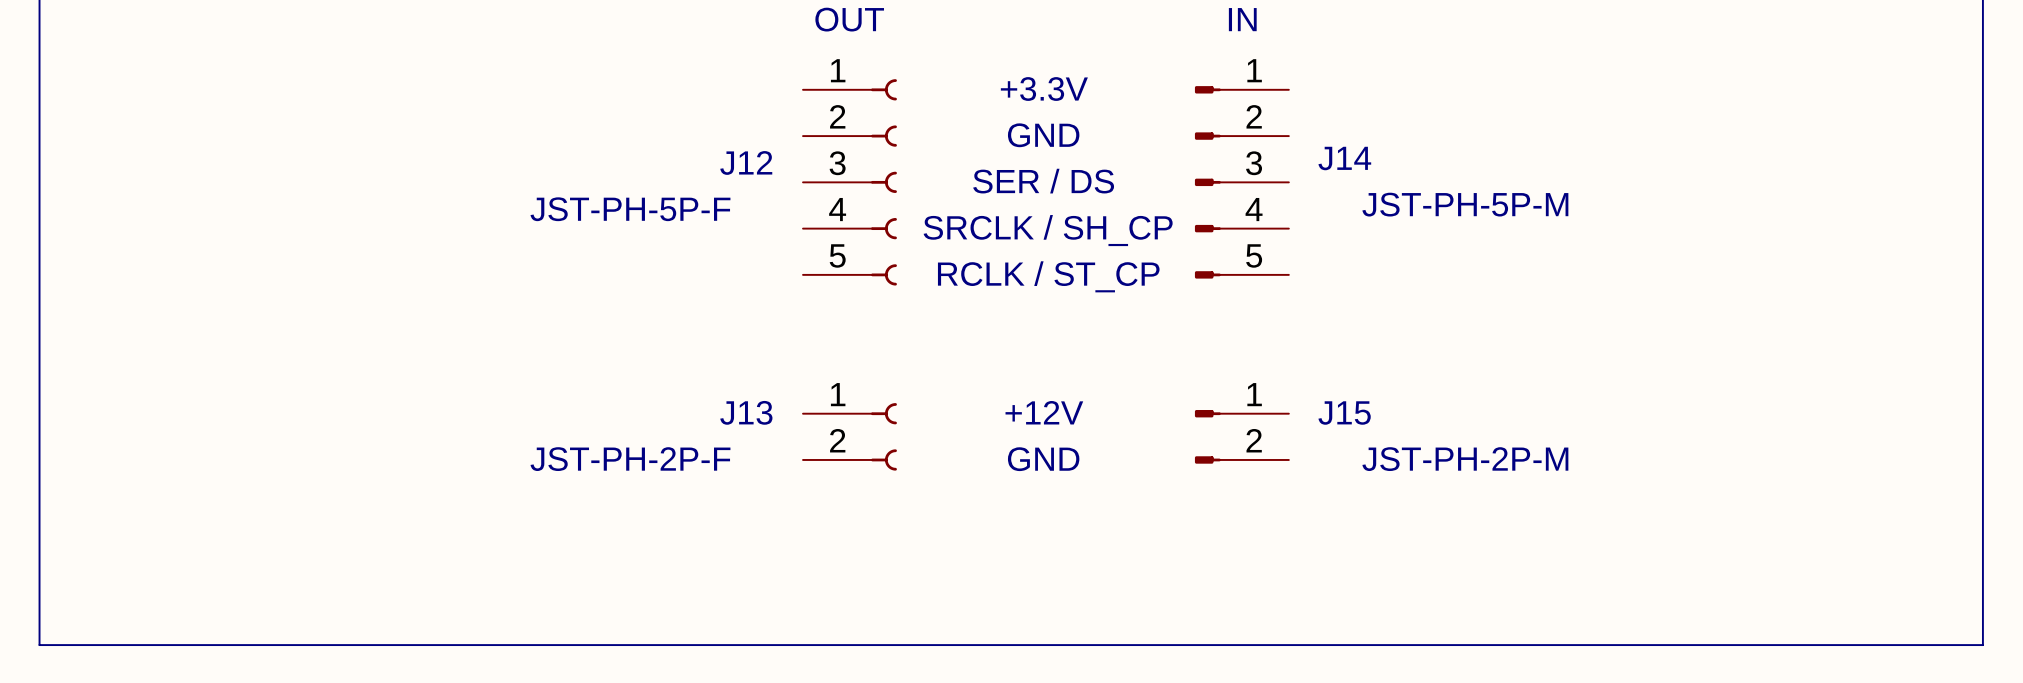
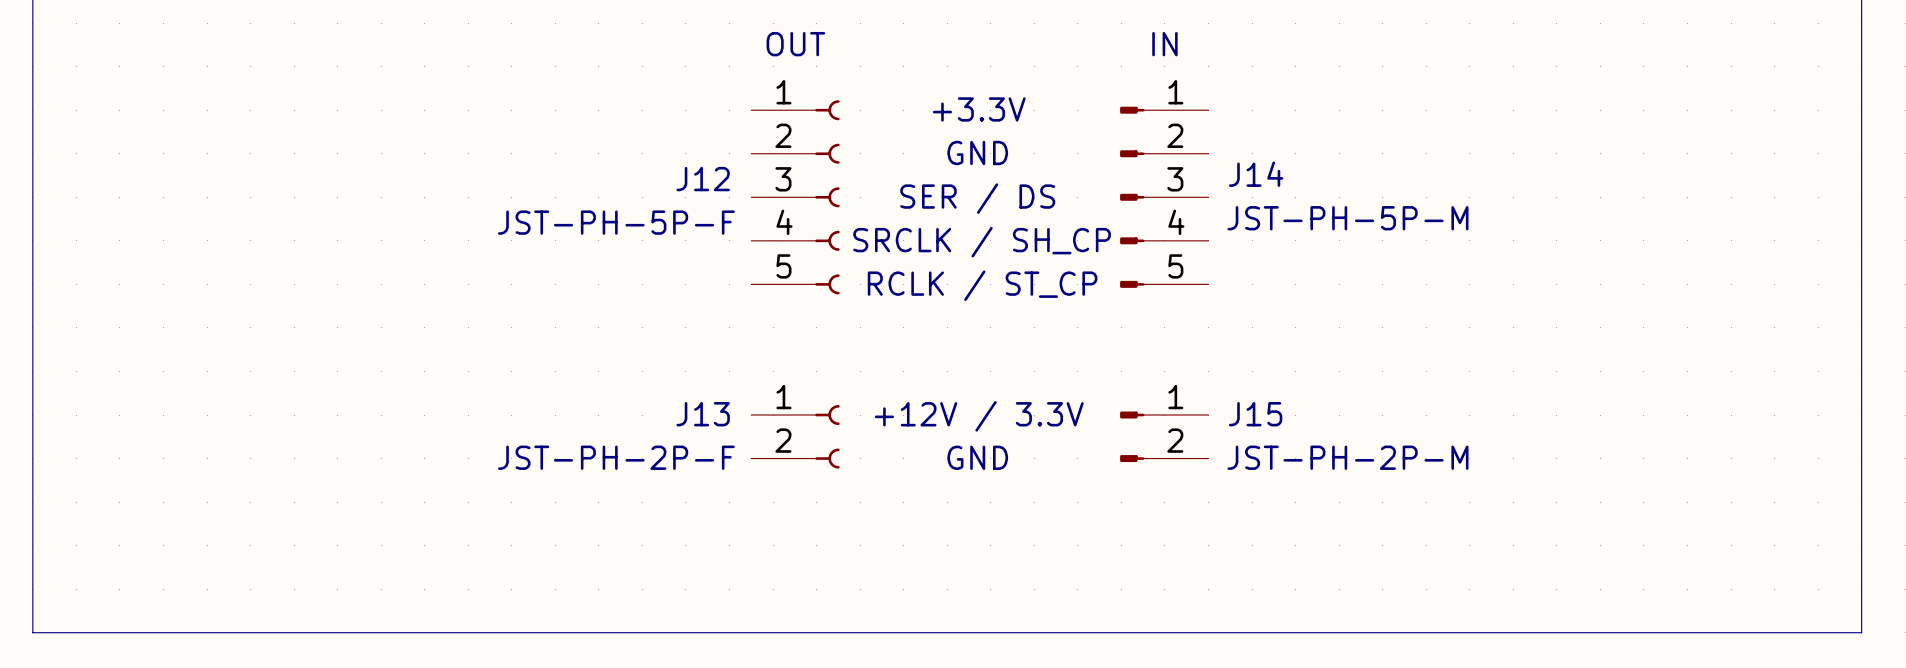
text: +12V (1044, 412) -> +12V / 3.3V (979, 416)

